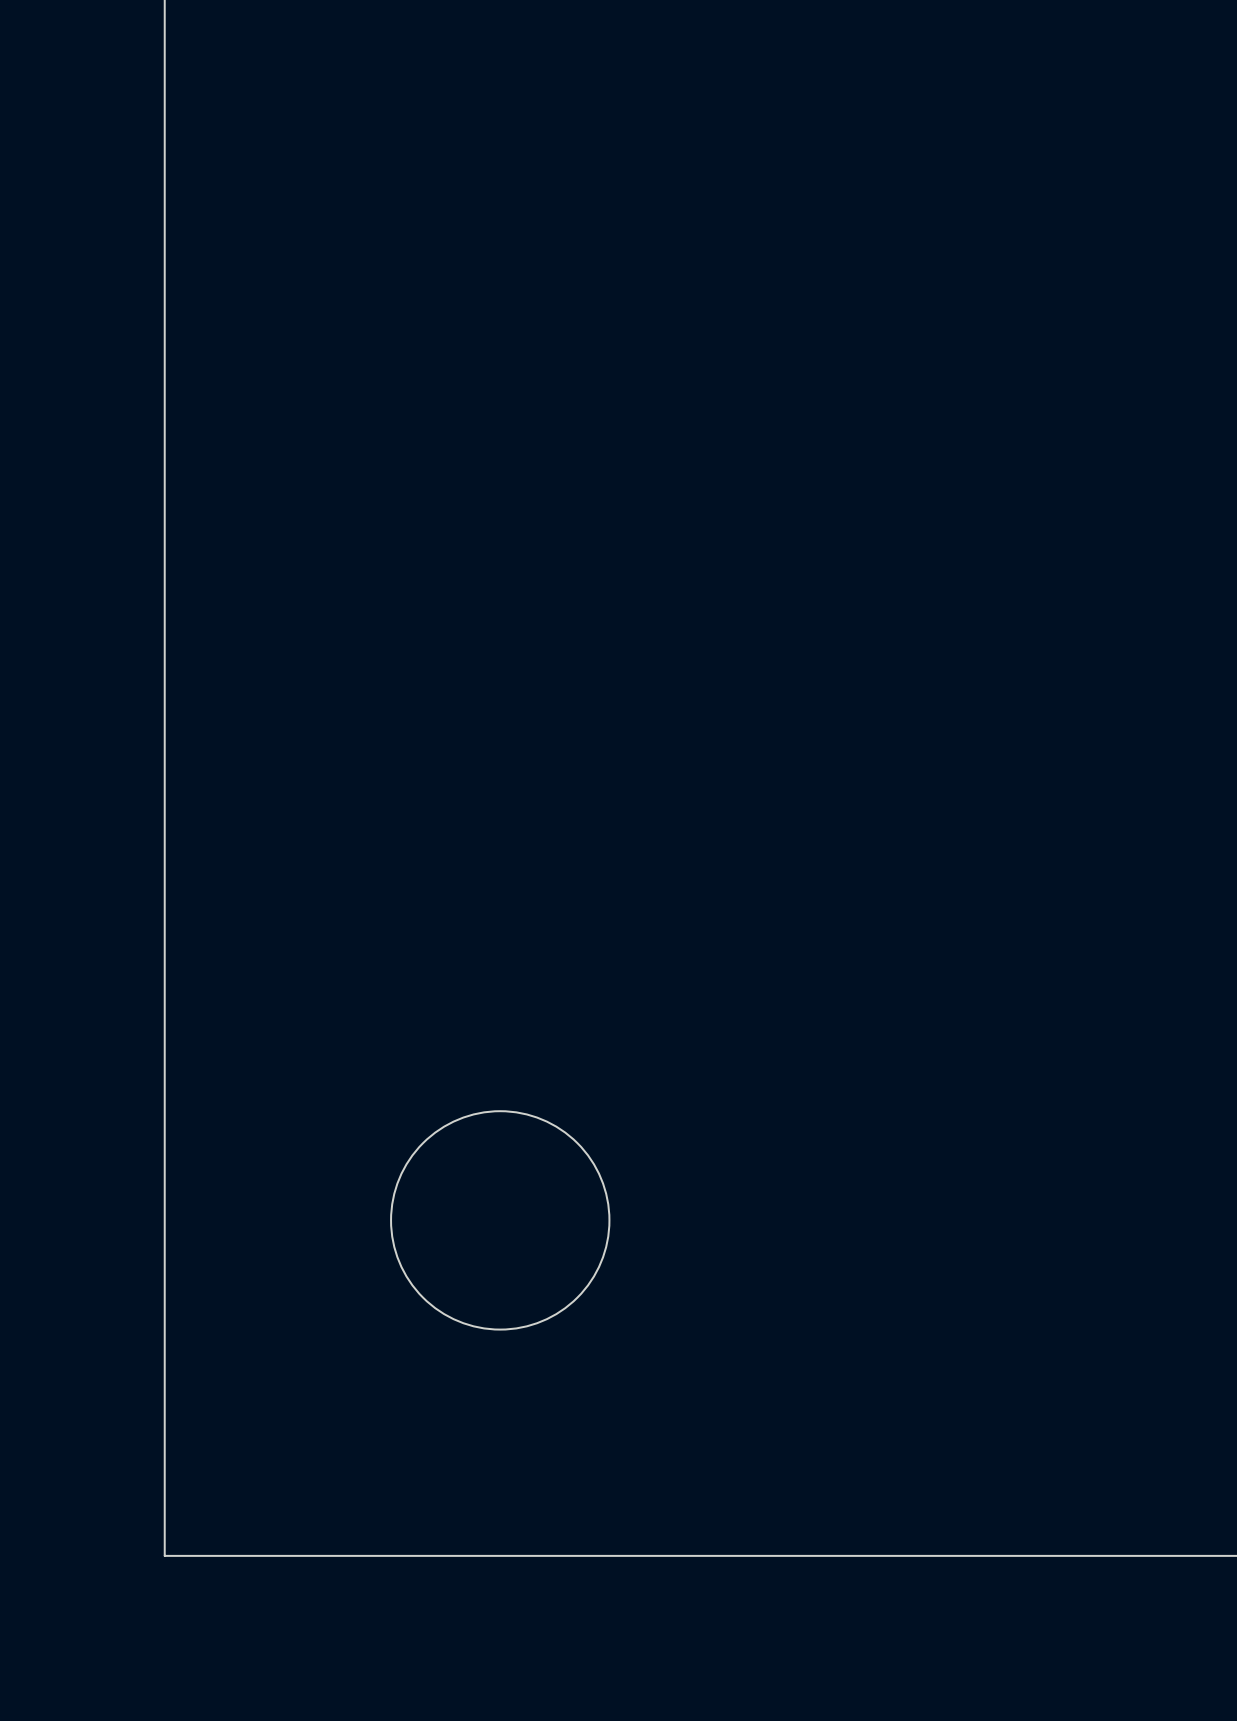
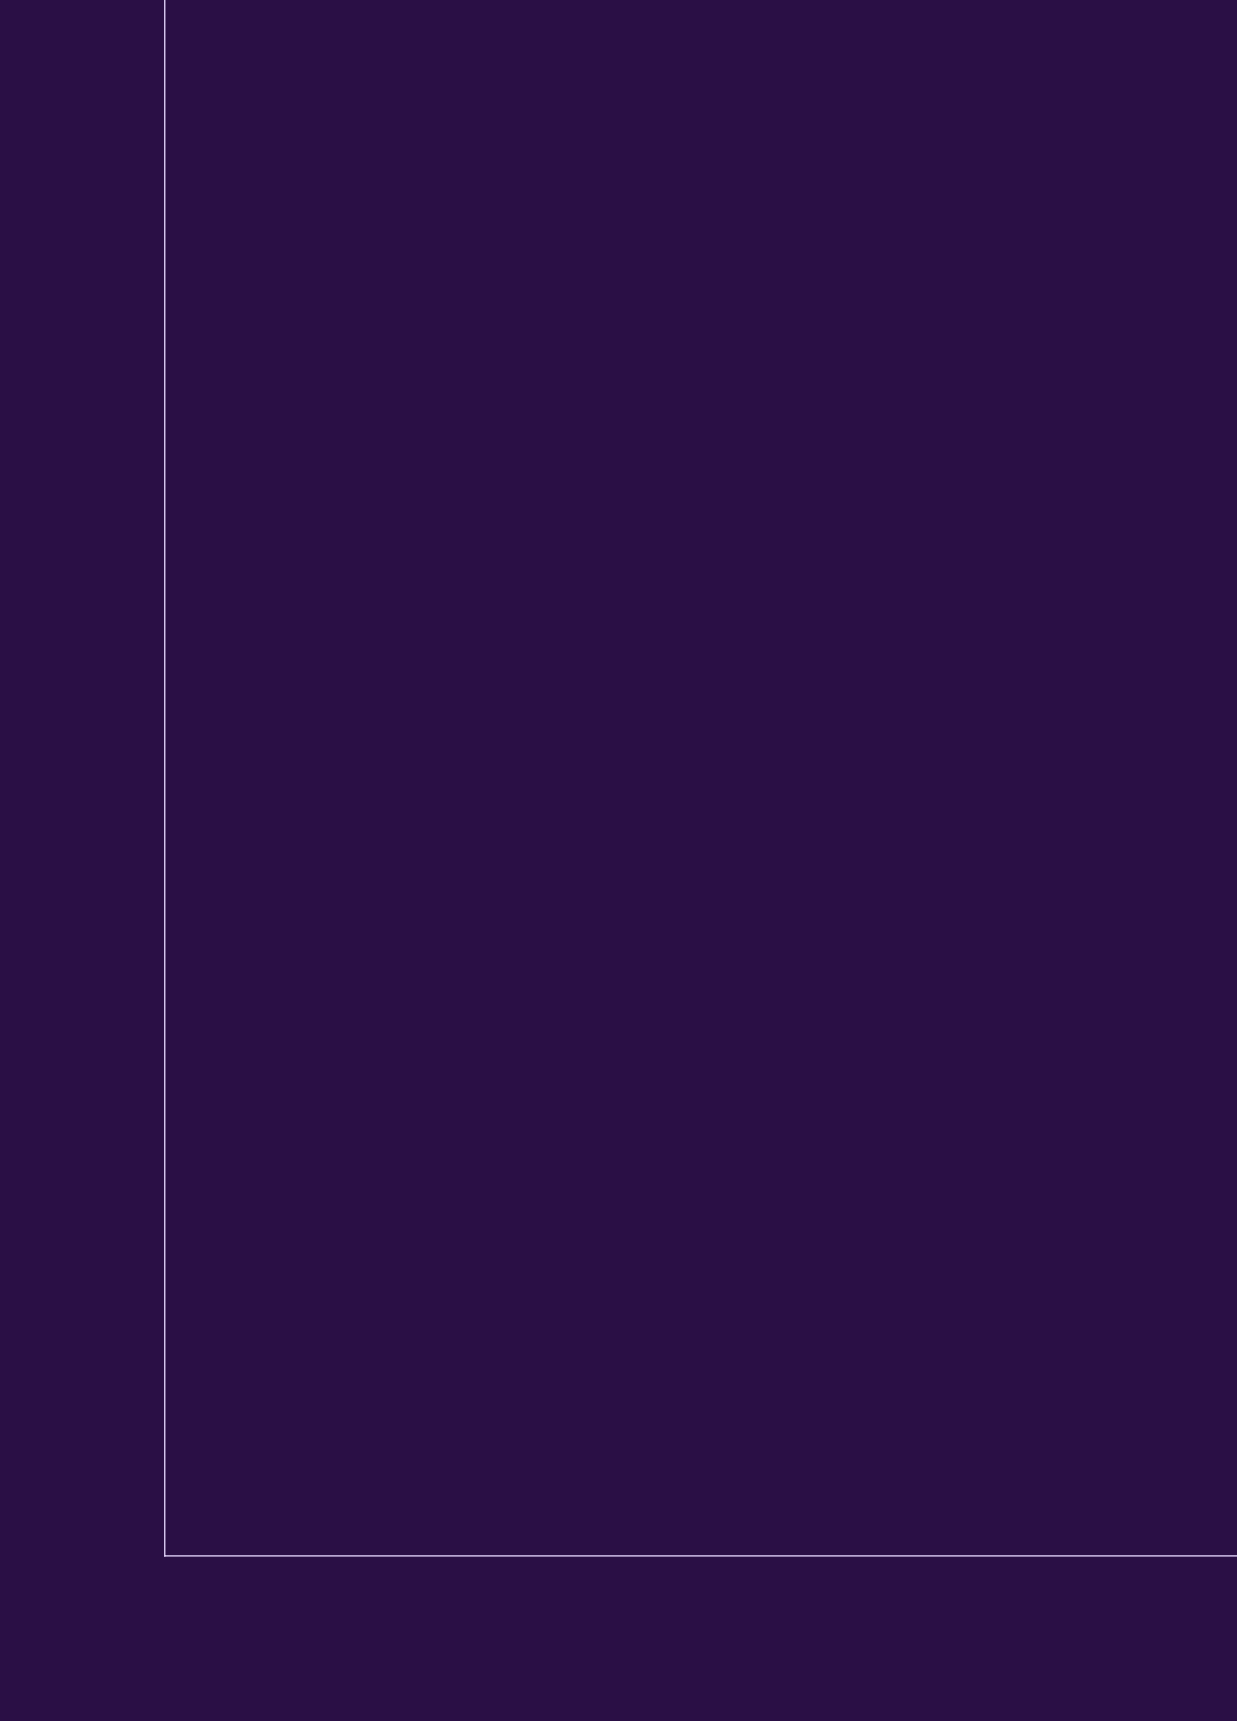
round board edge: [391, 1111, 610, 1330] -> none

